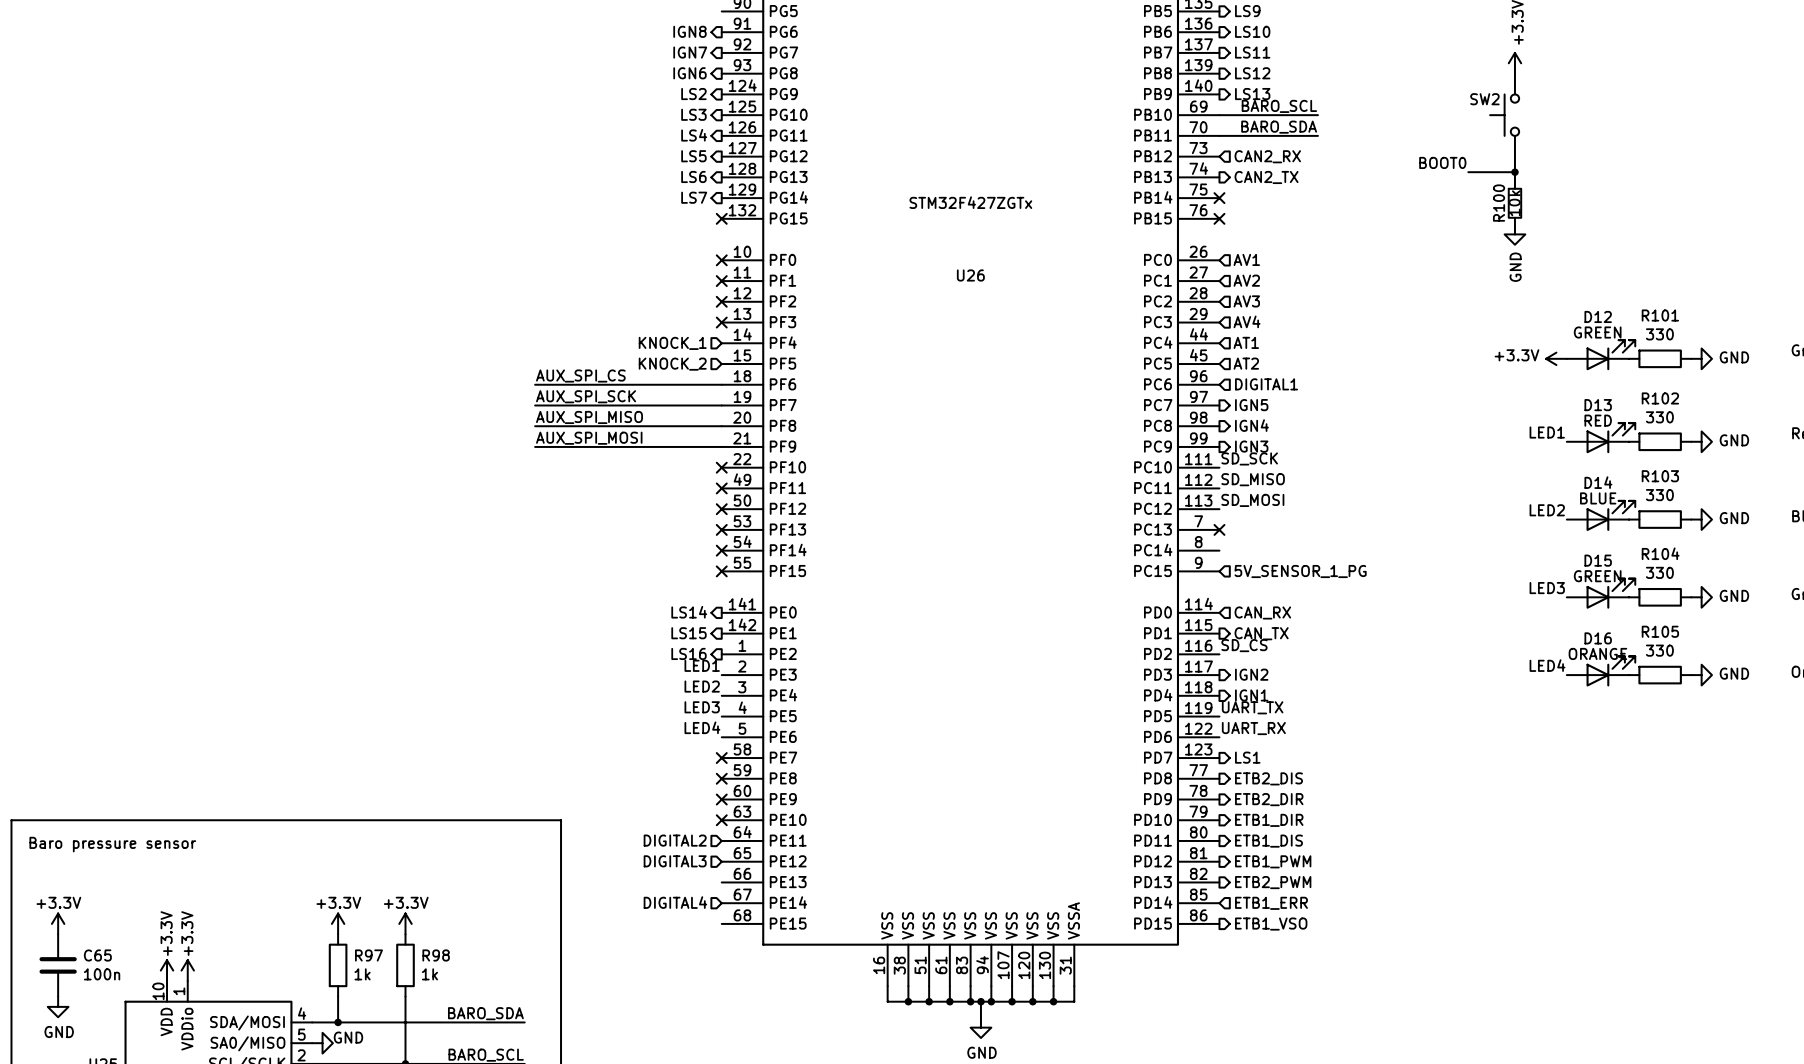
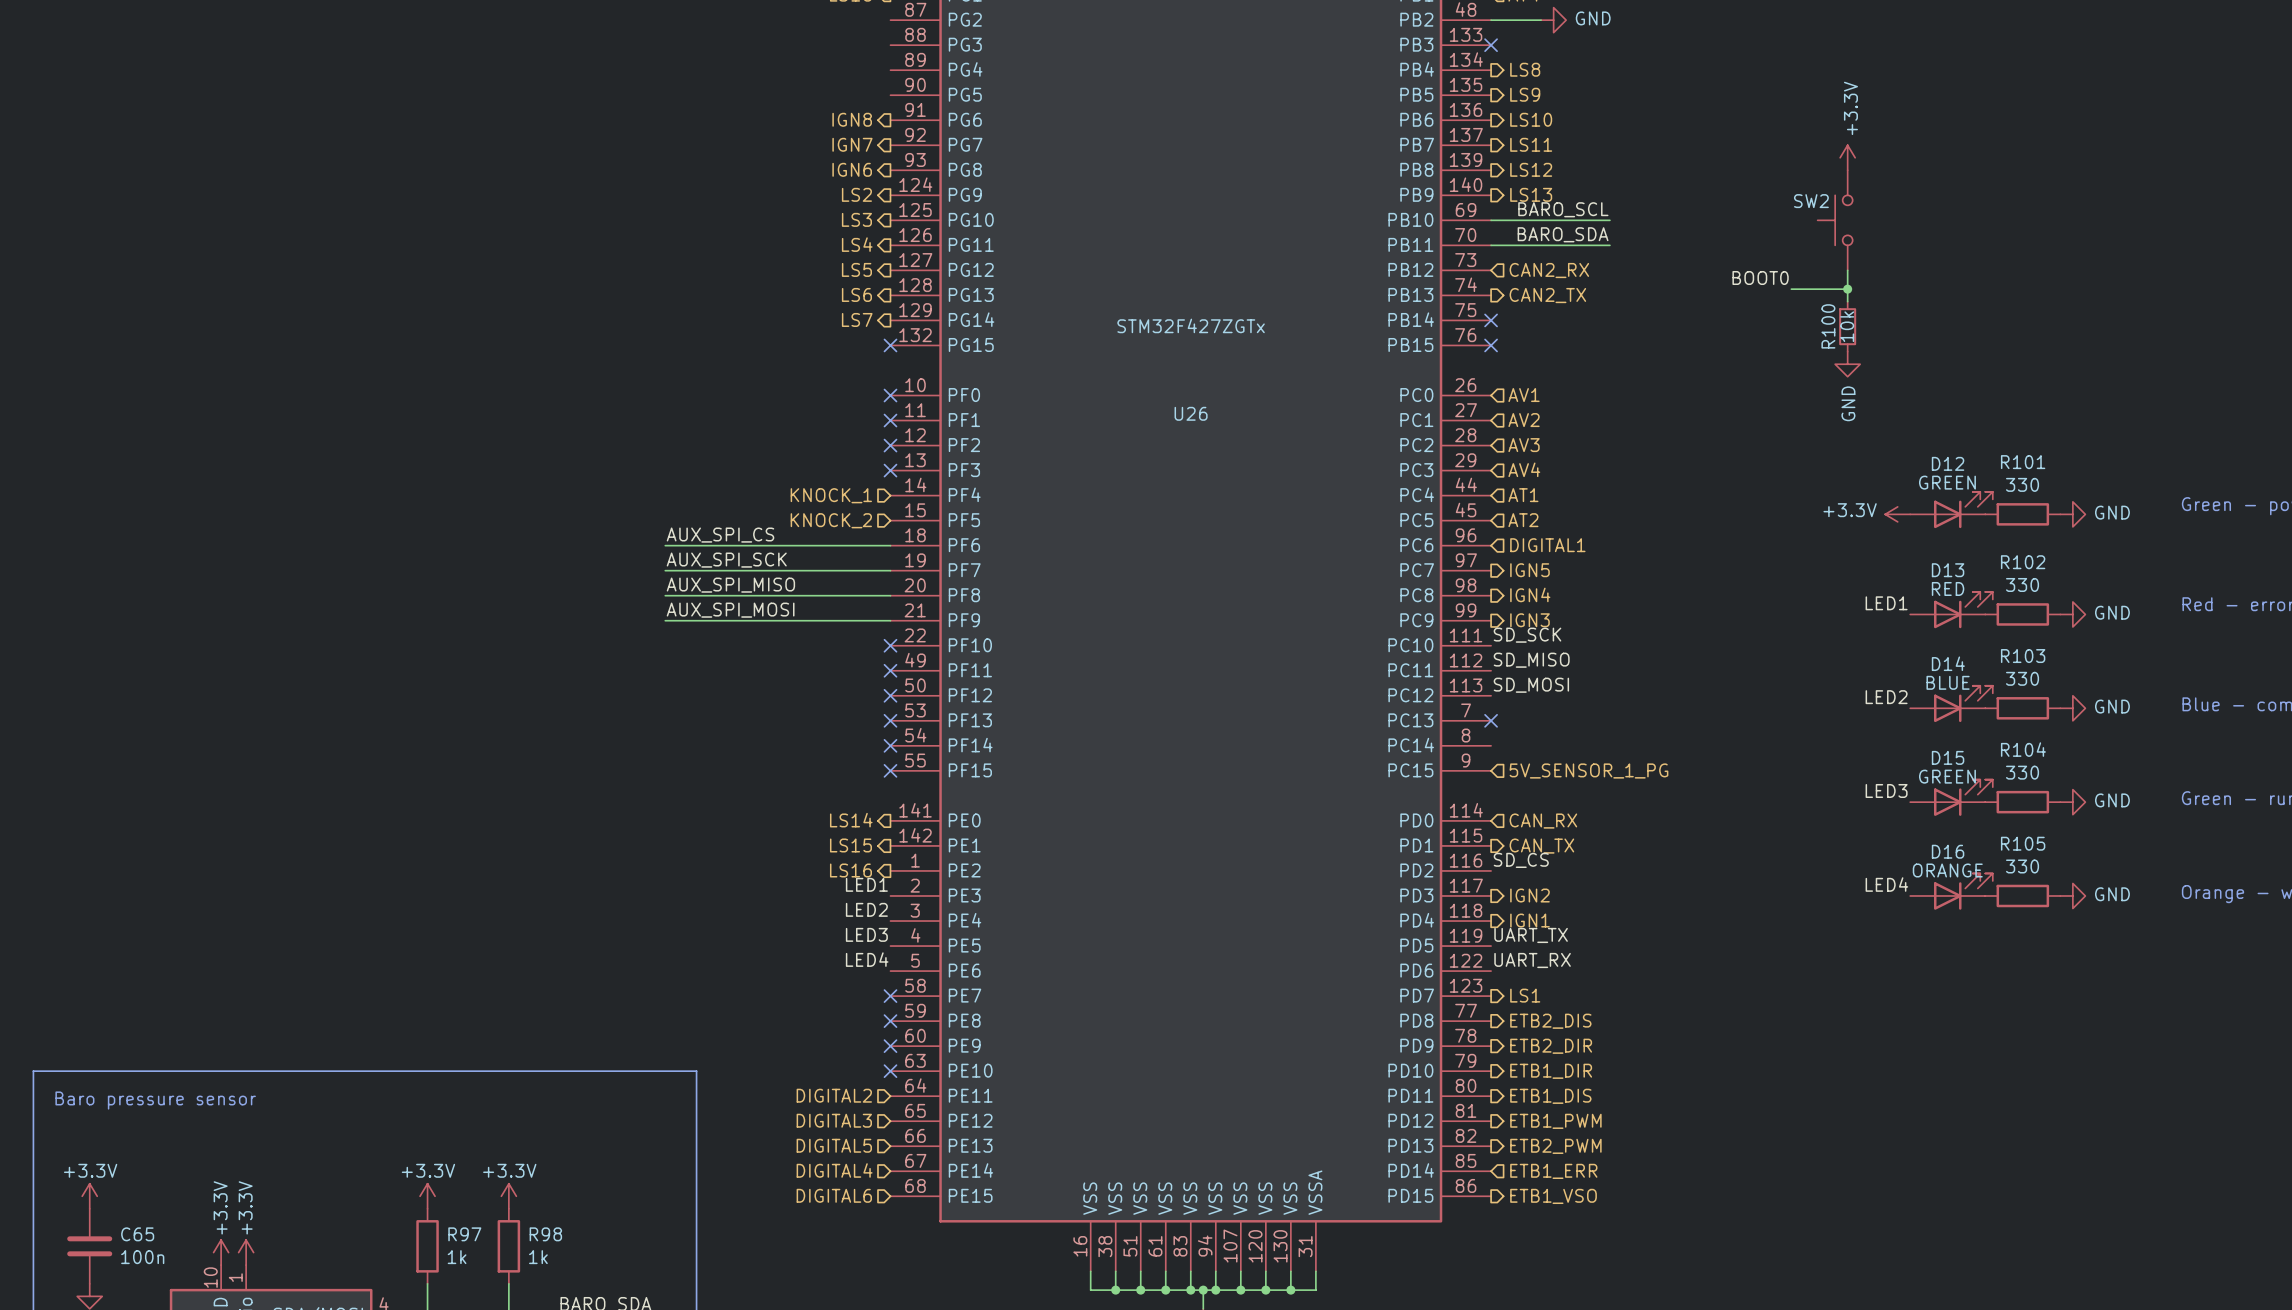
hierarchical label: none -> DIGITAL5 (834, 1145)
hierarchical label: none -> DIGITAL6 (834, 1195)

